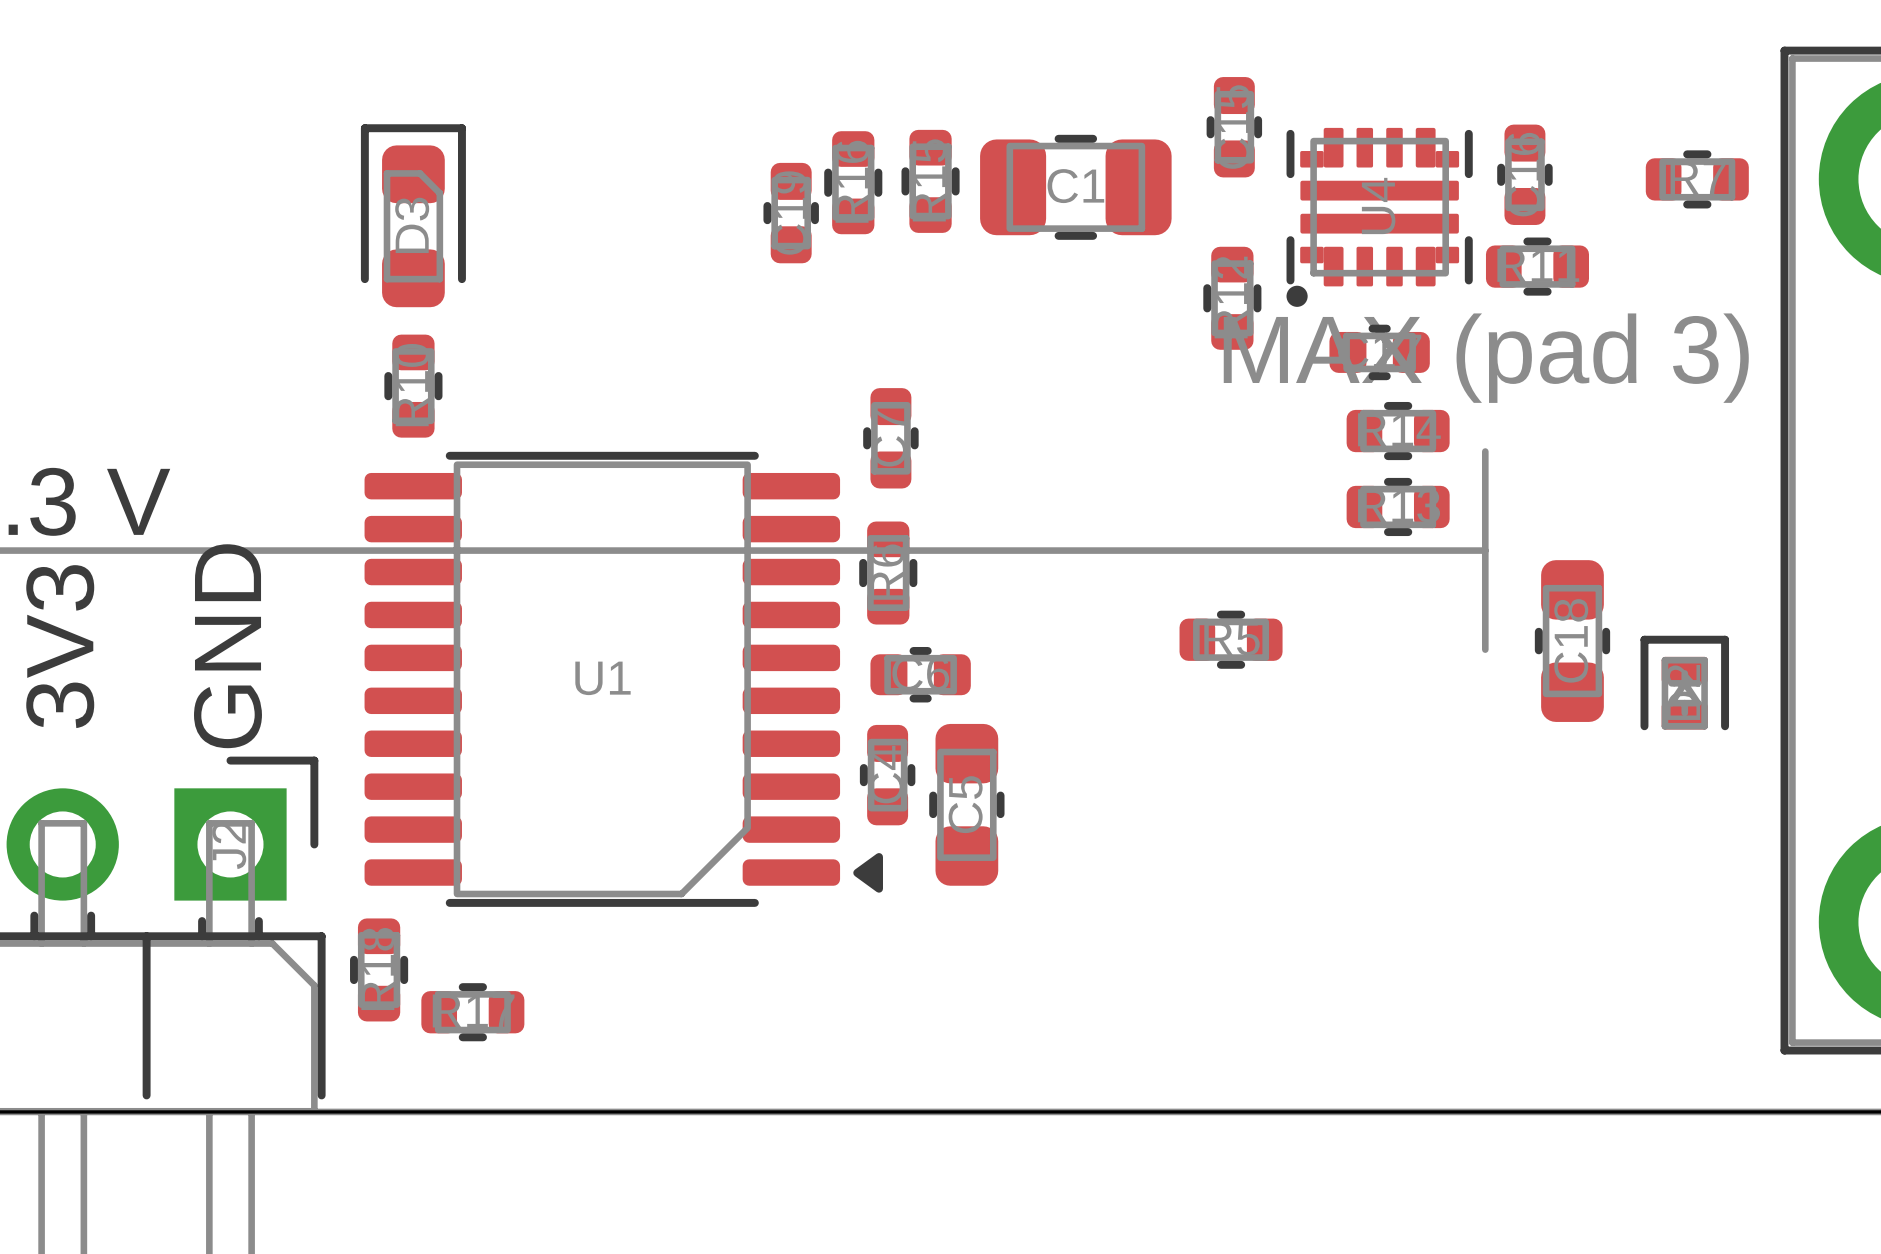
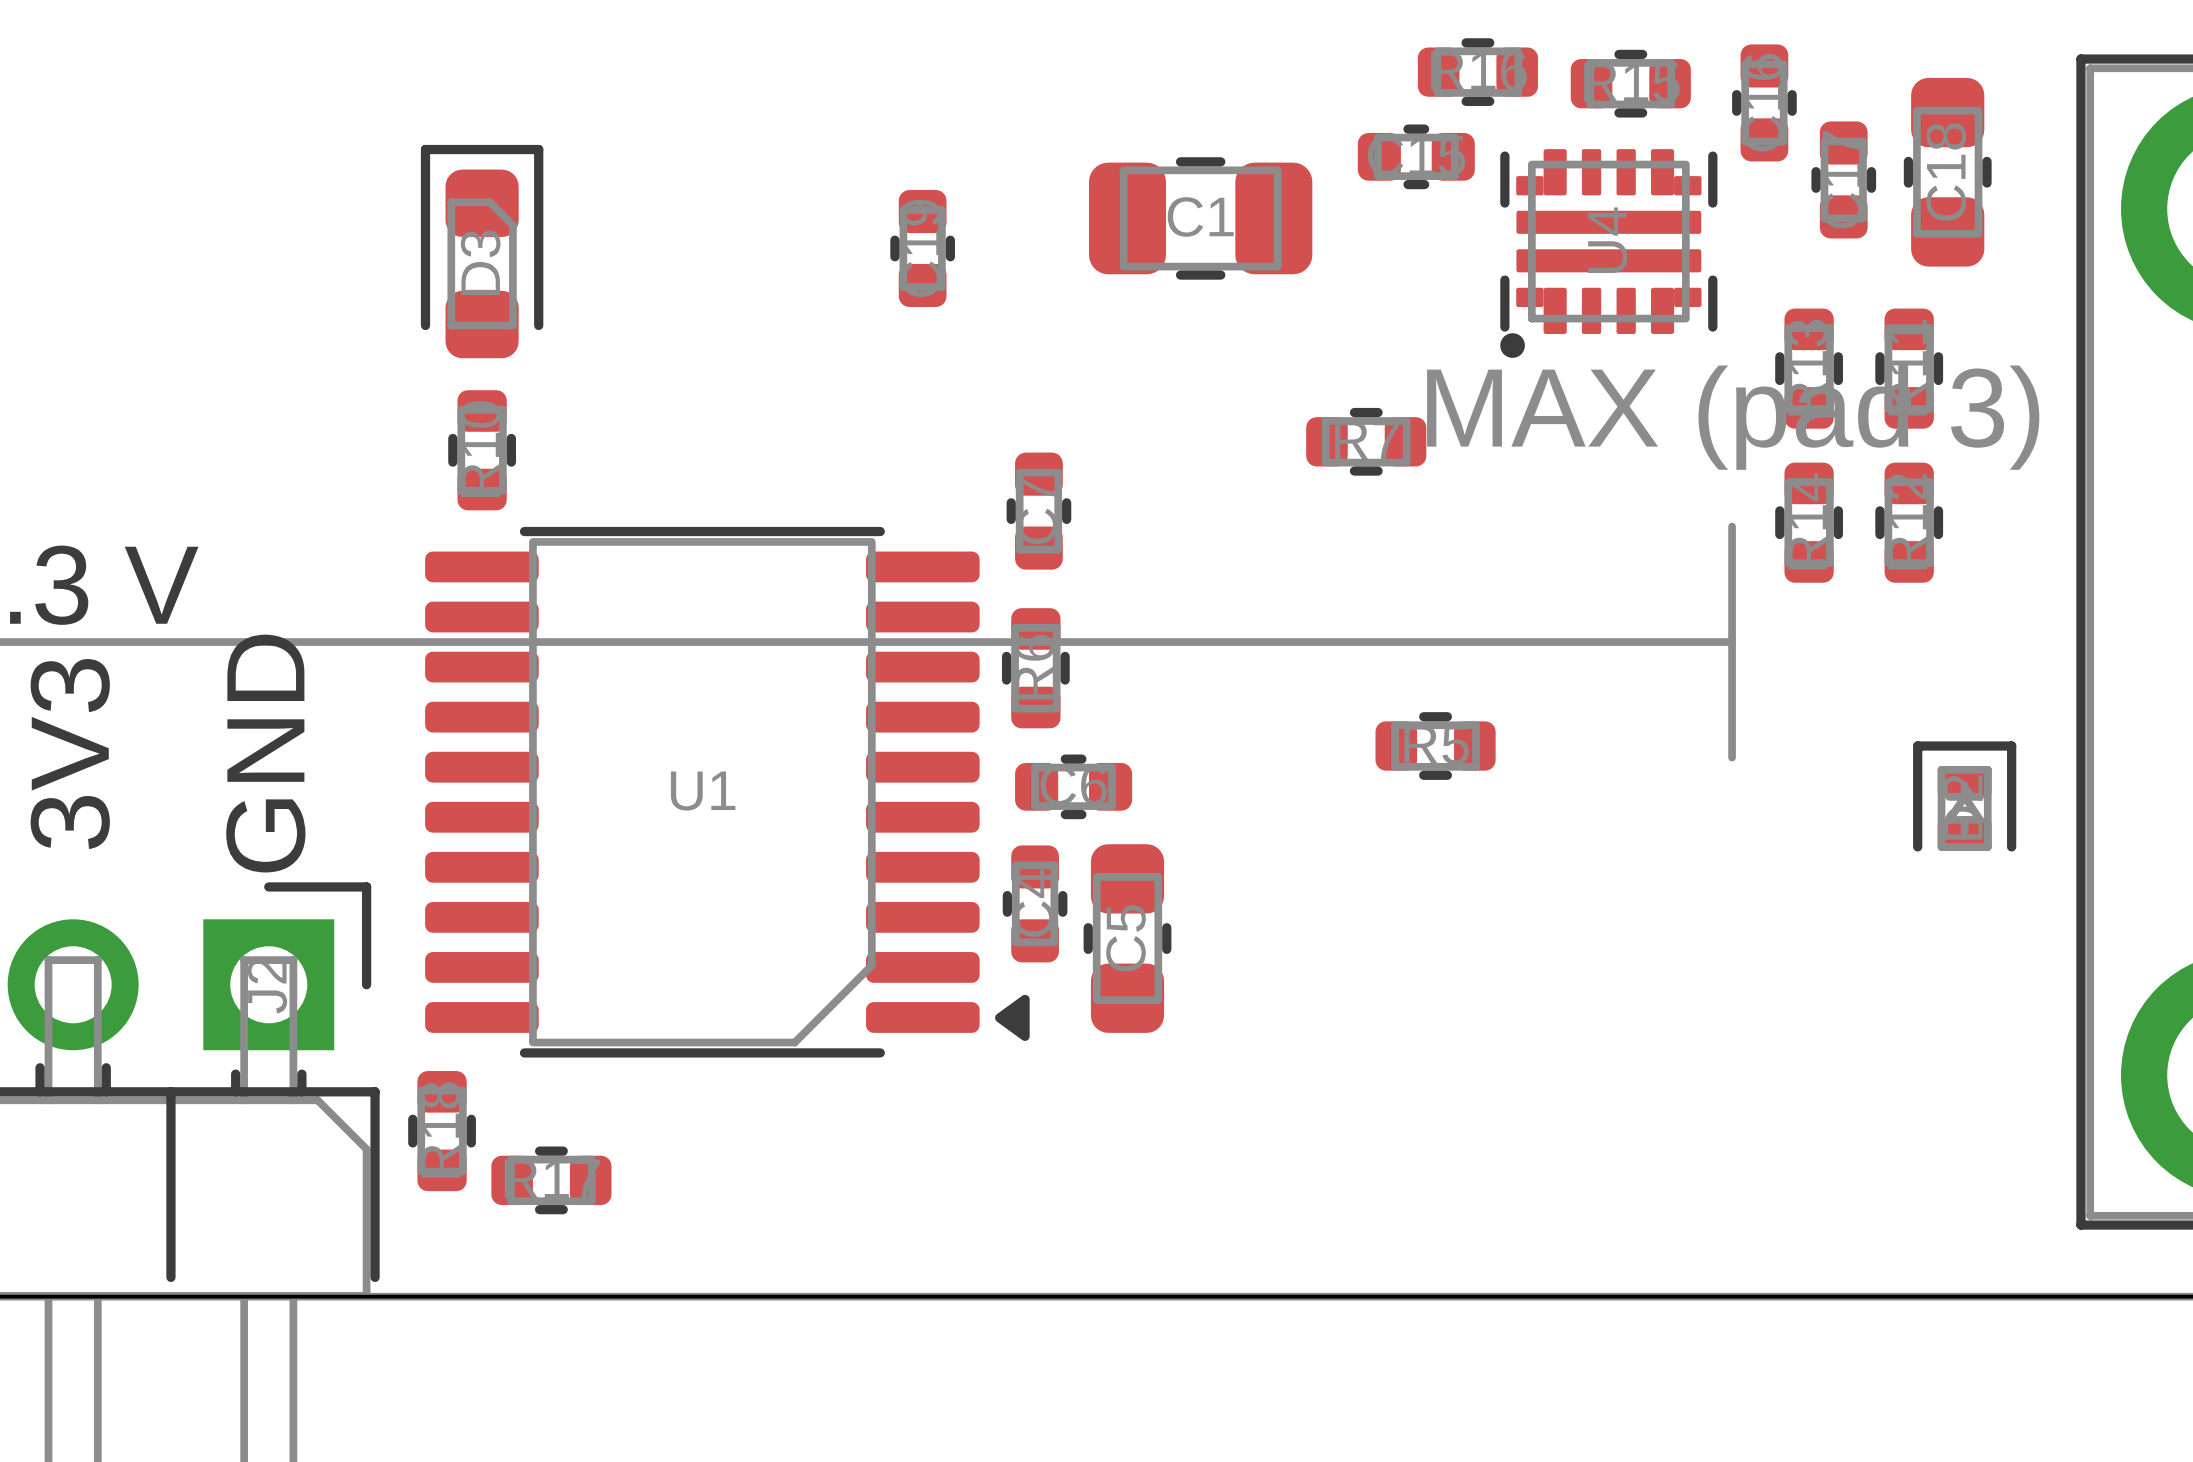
part rotation: 0° (1234, 127) -> 90° clockwise (1416, 156)
part position: (1524, 174) -> (1764, 102)
part position: (1697, 179) -> (1366, 441)
part rotation: 0° (930, 181) -> 90° clockwise (1630, 83)
part position: (930, 181) -> (1630, 83)
part rotation: 0° (853, 182) -> 90° clockwise (1477, 72)
part position: (853, 182) -> (1477, 72)
C1 position: (1075, 187) -> (1200, 218)
part rotation: 0° (1537, 266) -> 90° clockwise (1909, 368)
part position: (1537, 266) -> (1909, 368)
part position: (1232, 298) -> (1909, 522)
part rotation: 0° (1379, 352) -> 90° clockwise (1843, 179)
part position: (1379, 352) -> (1843, 179)
part rotation: 0° (1398, 431) -> 90° clockwise (1809, 522)
part position: (1398, 431) -> (1809, 522)
part rotation: 0° (1398, 506) -> 90° clockwise (1809, 368)
part position: (1398, 506) -> (1809, 368)
part position: (1572, 641) -> (1947, 172)

